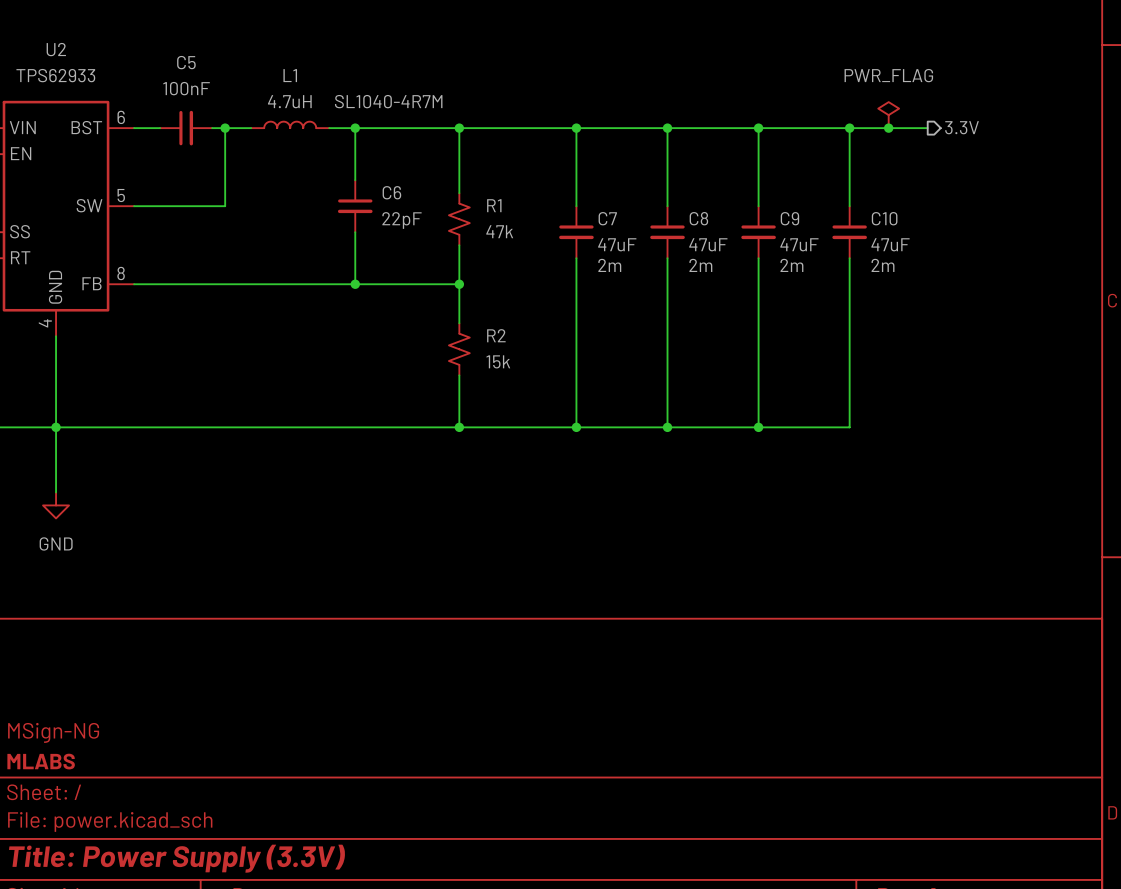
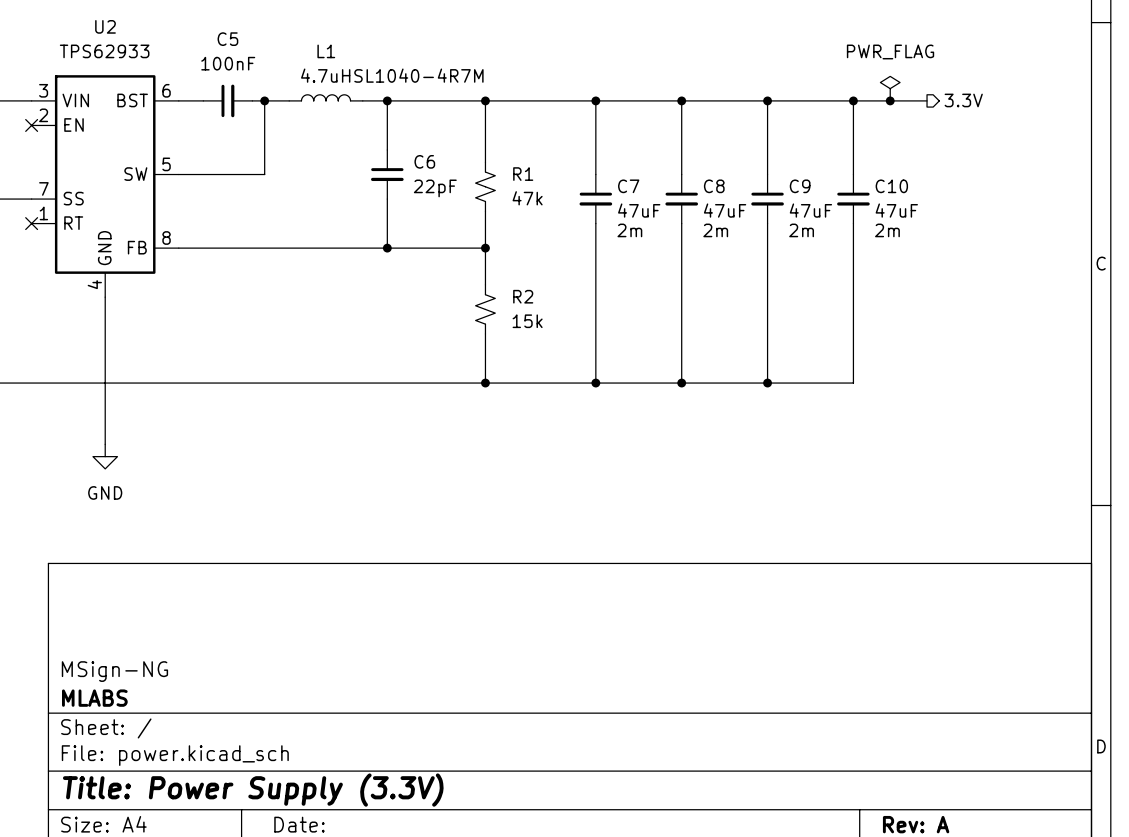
junction: (56, 427) -> none

